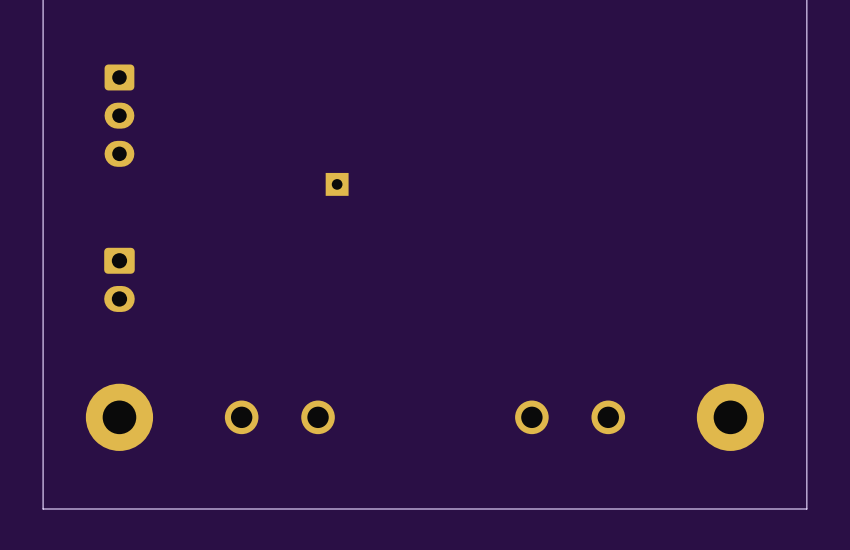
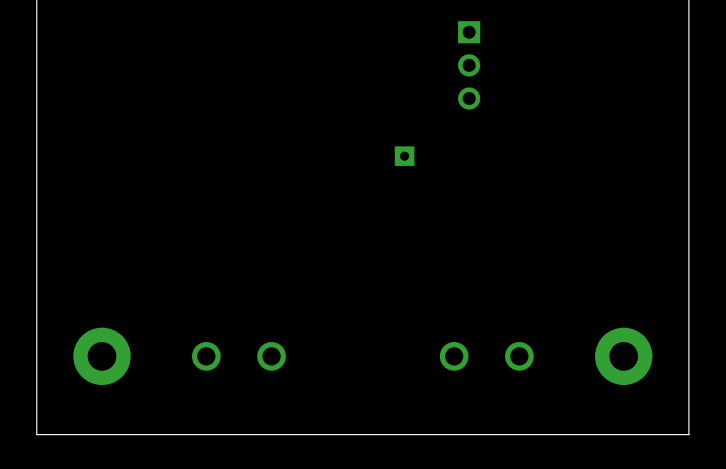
part: none -> (469, 65)
part: (119, 115) -> none
part position: (337, 184) -> (404, 156)
part: (119, 279) -> none

